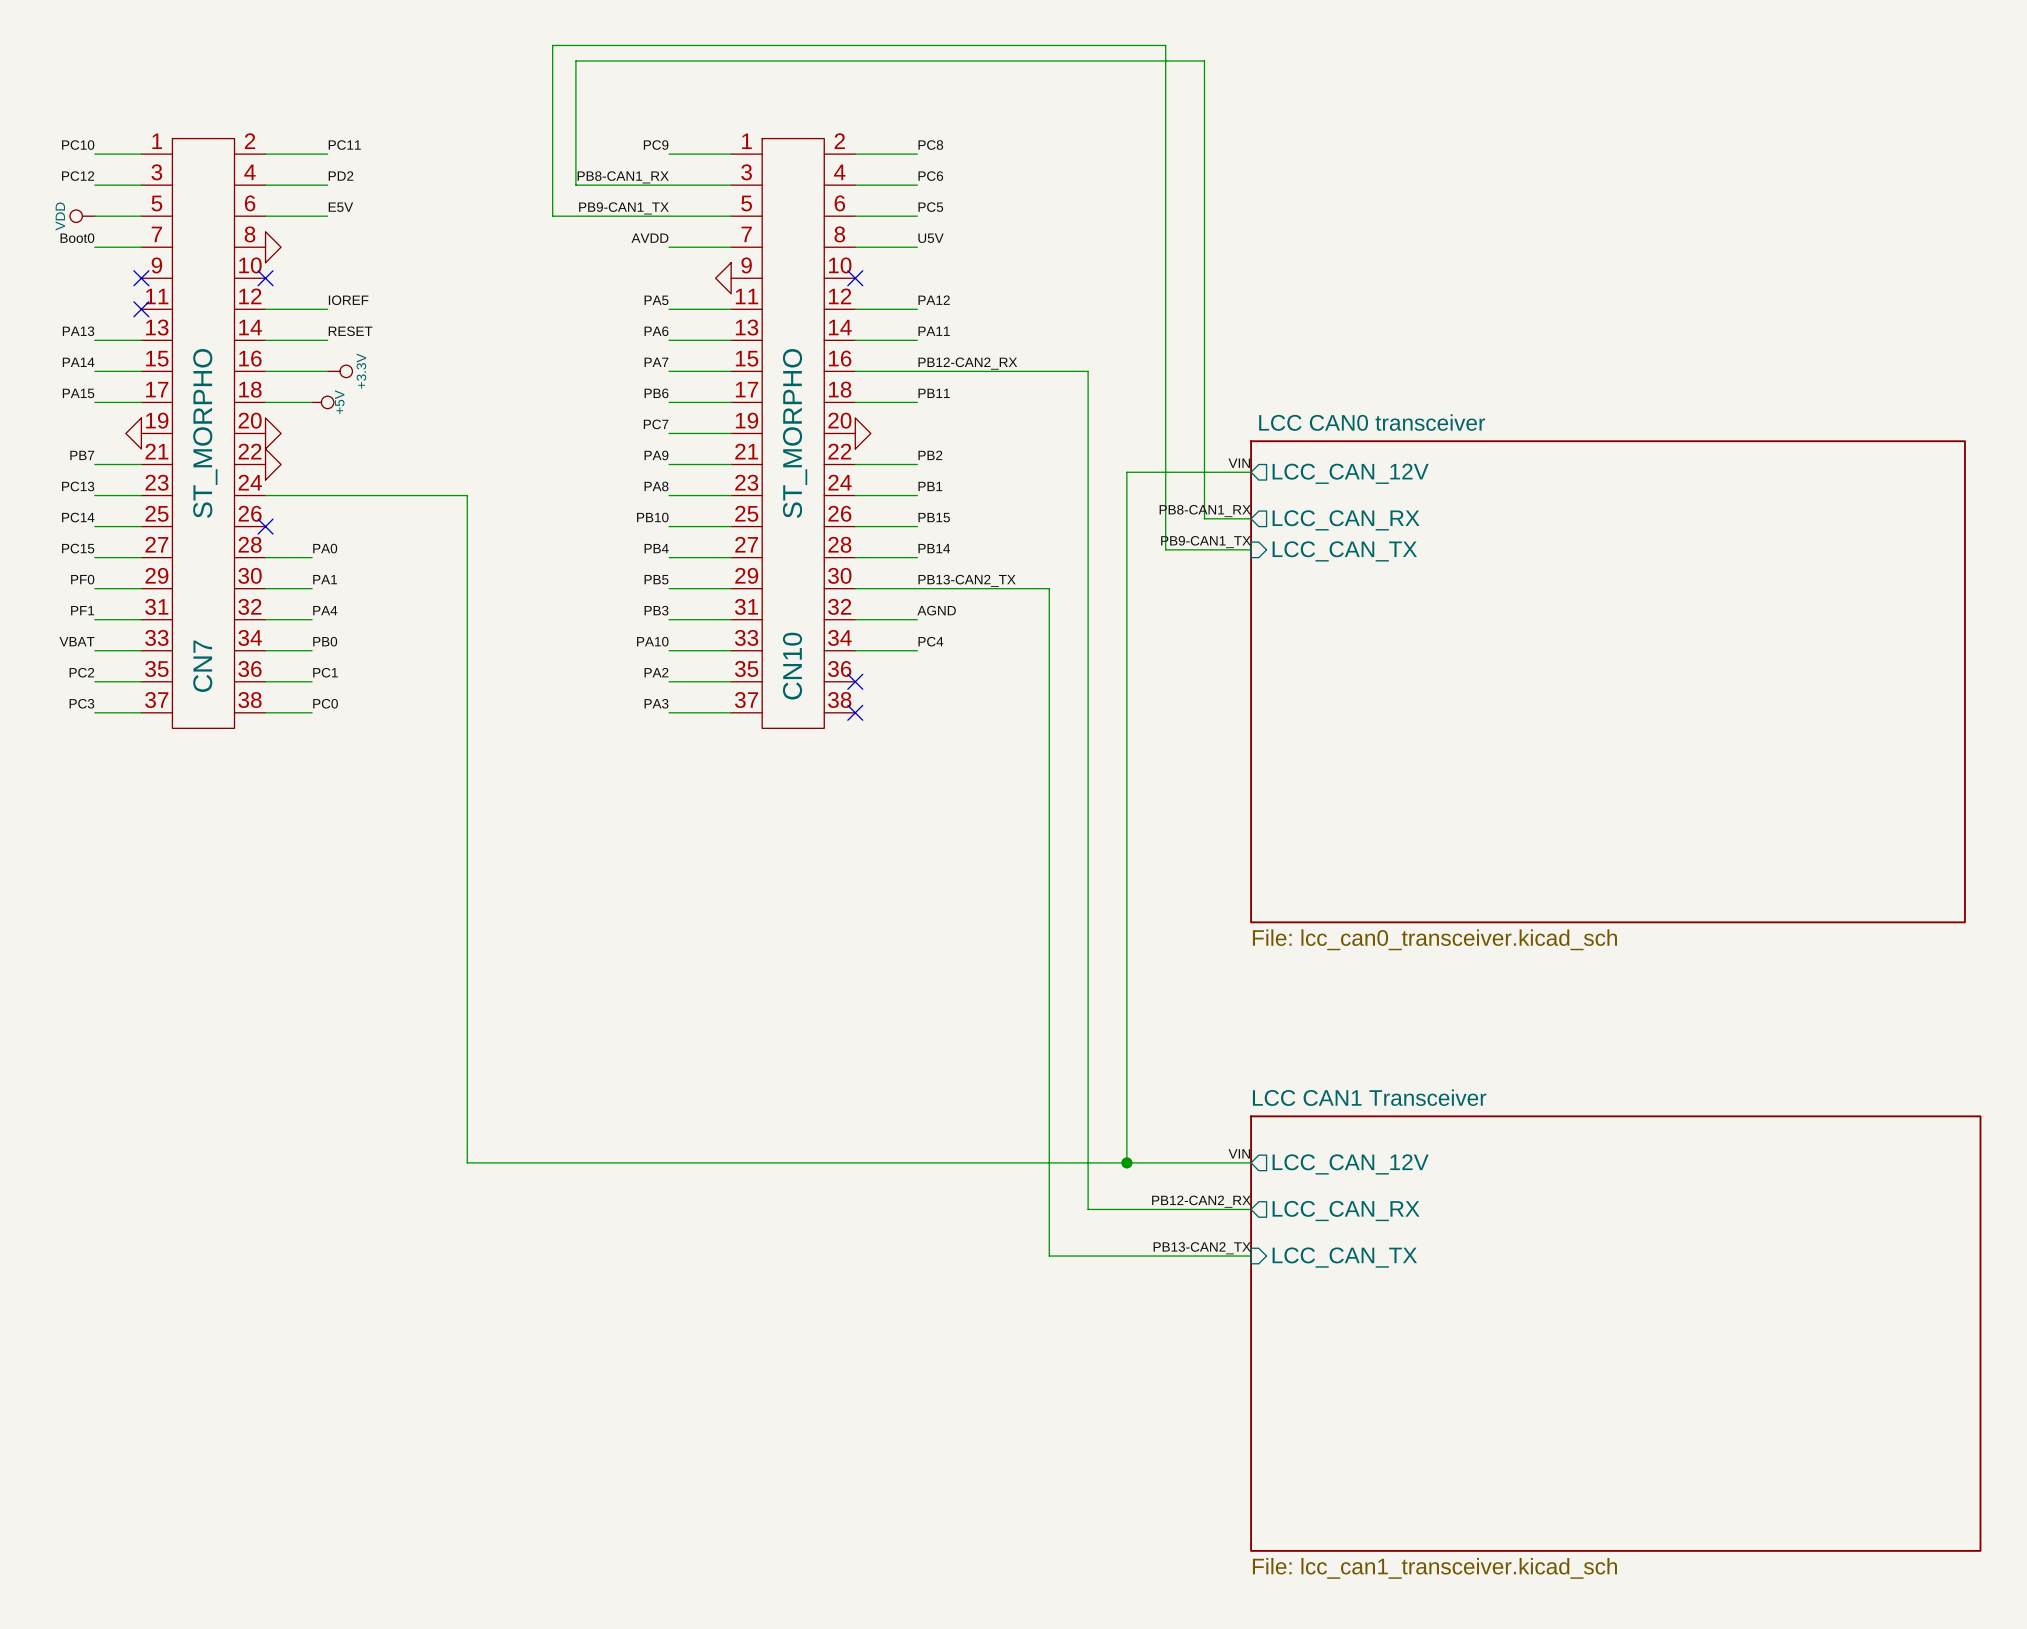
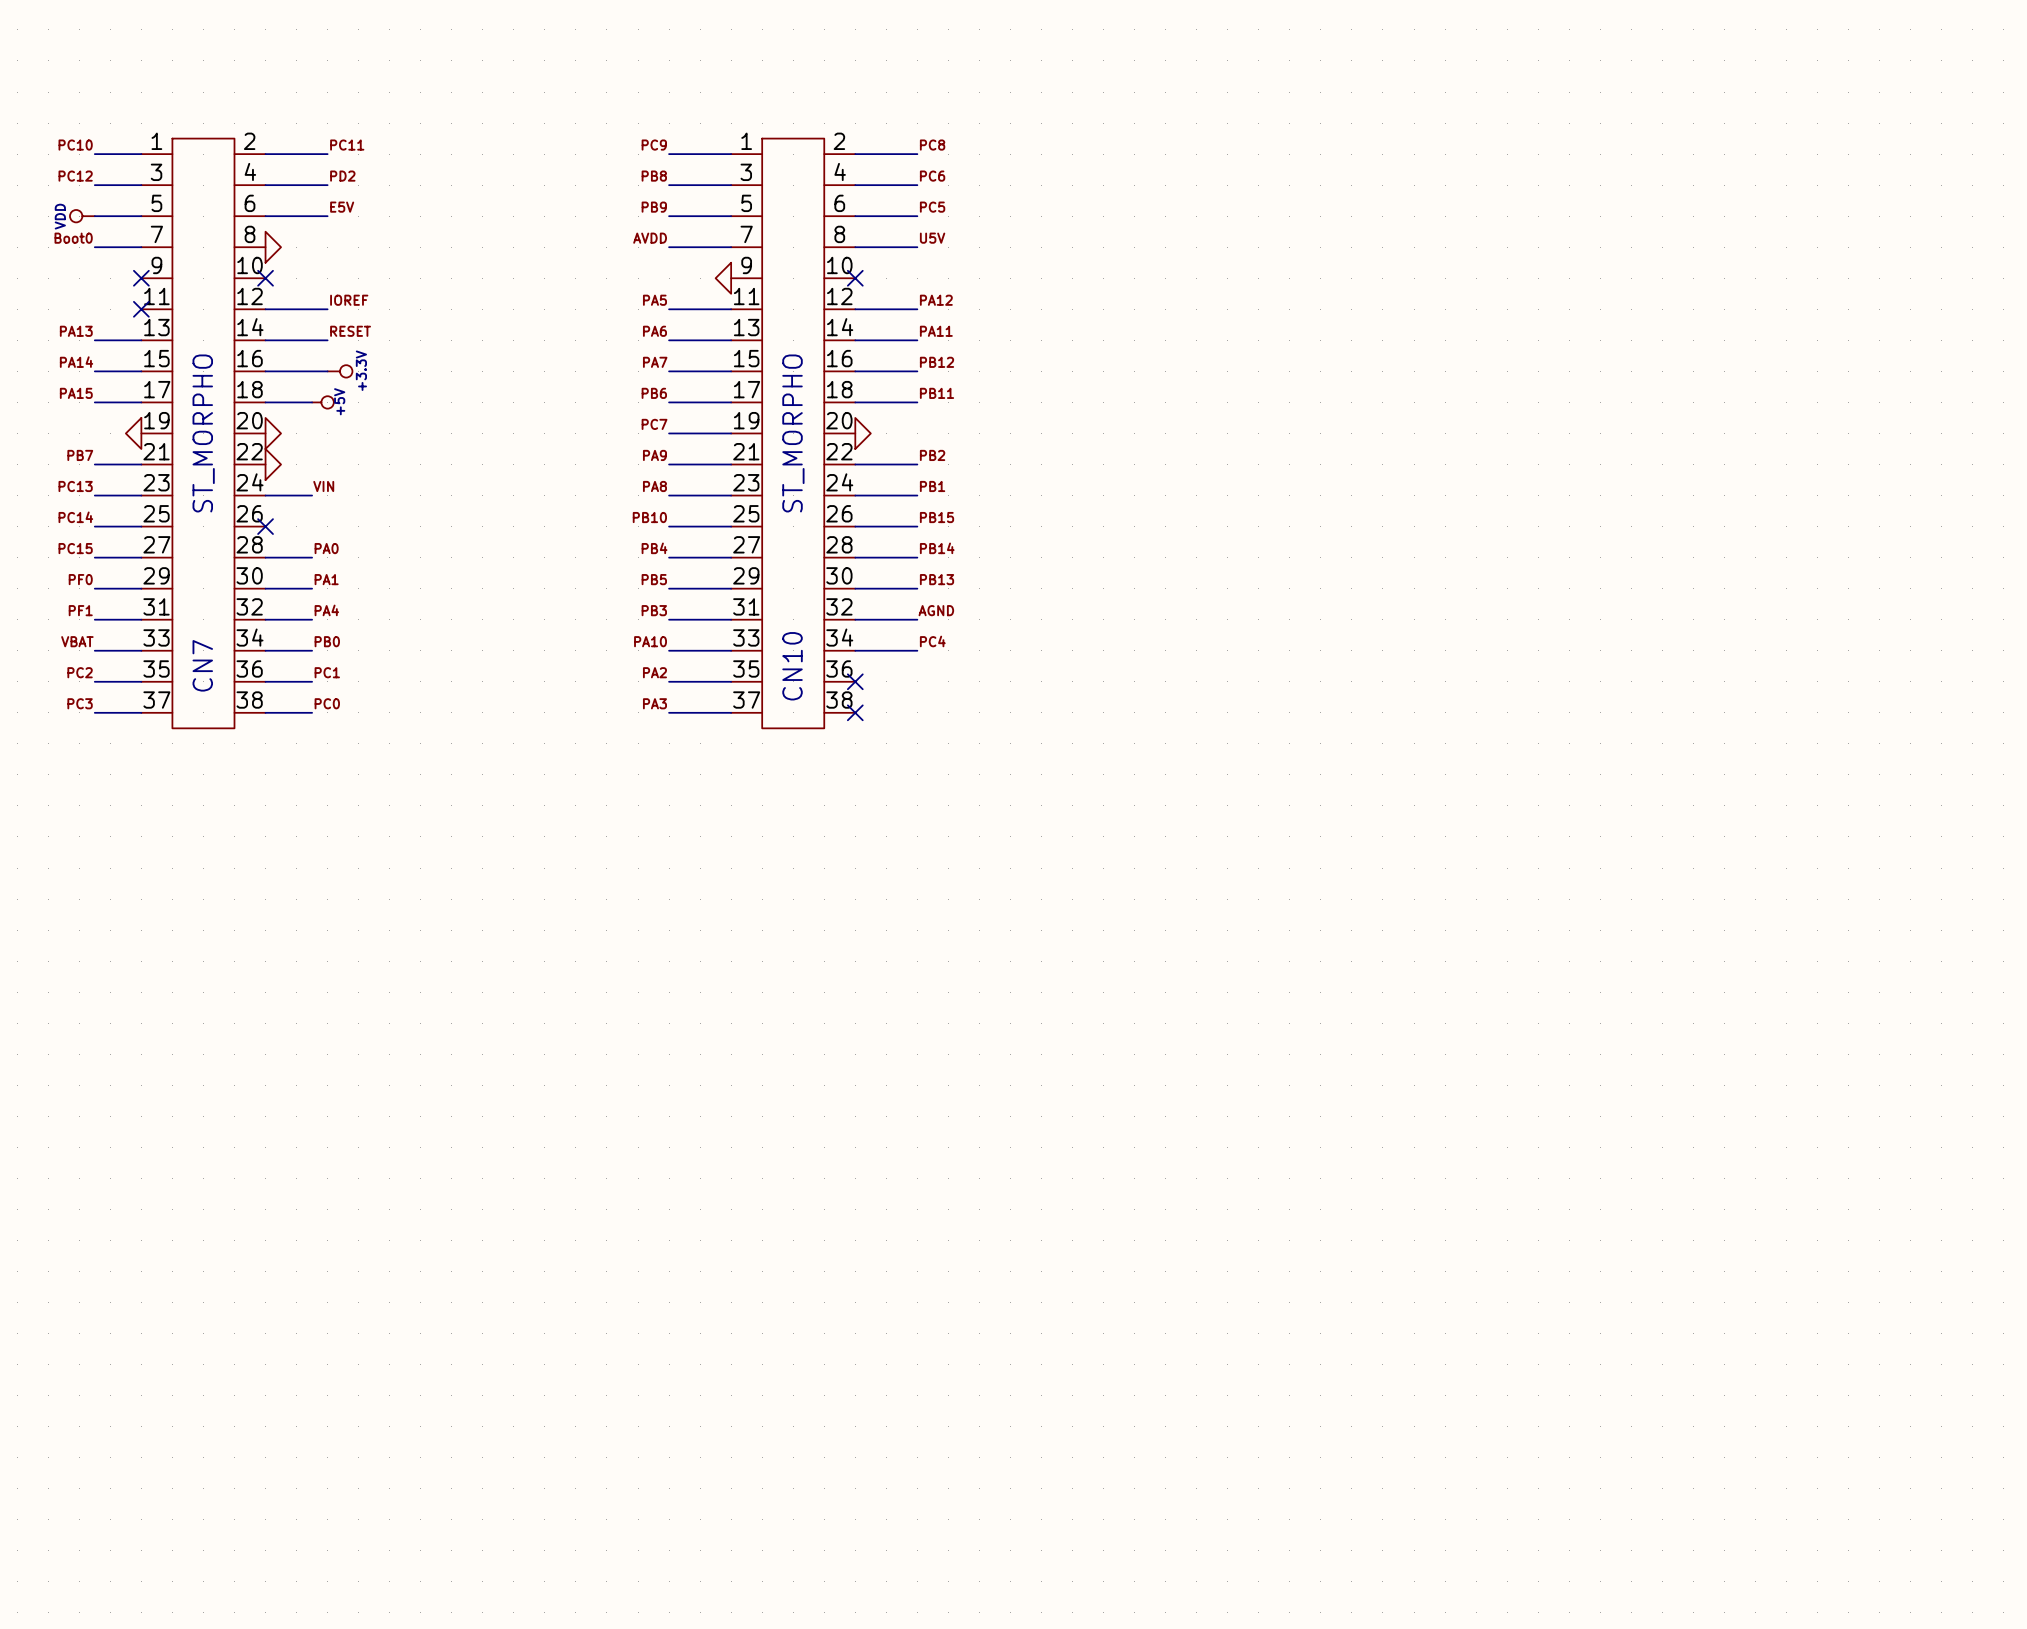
label: PB8-CAN1_RX (623, 177) -> PB8 (654, 176)
wire: (669, 185) (575, 185) (575, 60) (1204, 60) (1204, 518) (1251, 518) -> none
label: PB9-CAN1_TX (623, 208) -> PB9 (654, 207)
wire: (669, 216) (552, 216) (552, 45) (1165, 45) (1165, 549) (1251, 549) -> none
label: PB12-CAN2_RX (967, 363) -> PB12 (937, 362)
wire: (917, 371) (1088, 371) (1088, 1209) (1251, 1209) -> none
label: VIN (1239, 463) -> none
wire: (1251, 472) (1126, 472) (1126, 1162) -> none
sheet pin: LCC_CAN_12V (1350, 473) -> none
label: none -> VIN (323, 486)
wire: (312, 495) (467, 495) (467, 1162) (1251, 1162) -> none
label: PB8-CAN1_RX (1205, 511) -> none
sheet pin: LCC_CAN_RX (1346, 520) -> none
label: PB9-CAN1_TX (1205, 542) -> none
sheet pin: LCC_CAN_TX (1344, 551) -> none
label: PB13-CAN2_TX (967, 580) -> PB13 (937, 579)
wire: (917, 588) (1049, 588) (1049, 1256) (1251, 1256) -> none
sheet LCC CAN0 transceiver: File: lcc_can0_transceiver.kicad_sch (1608, 681) -> none
label: VIN (1239, 1153) -> none
junction: (1126, 1162) -> none
sheet pin: LCC_CAN_12V (1350, 1164) -> none
label: PB12-CAN2_RX (1201, 1201) -> none
sheet pin: LCC_CAN_RX (1346, 1211) -> none
label: PB13-CAN2_TX (1202, 1248) -> none
sheet pin: LCC_CAN_TX (1344, 1257) -> none
sheet LCC CAN1 Transceiver: File: lcc_can1_transceiver.kicad_sch (1615, 1333) -> none

